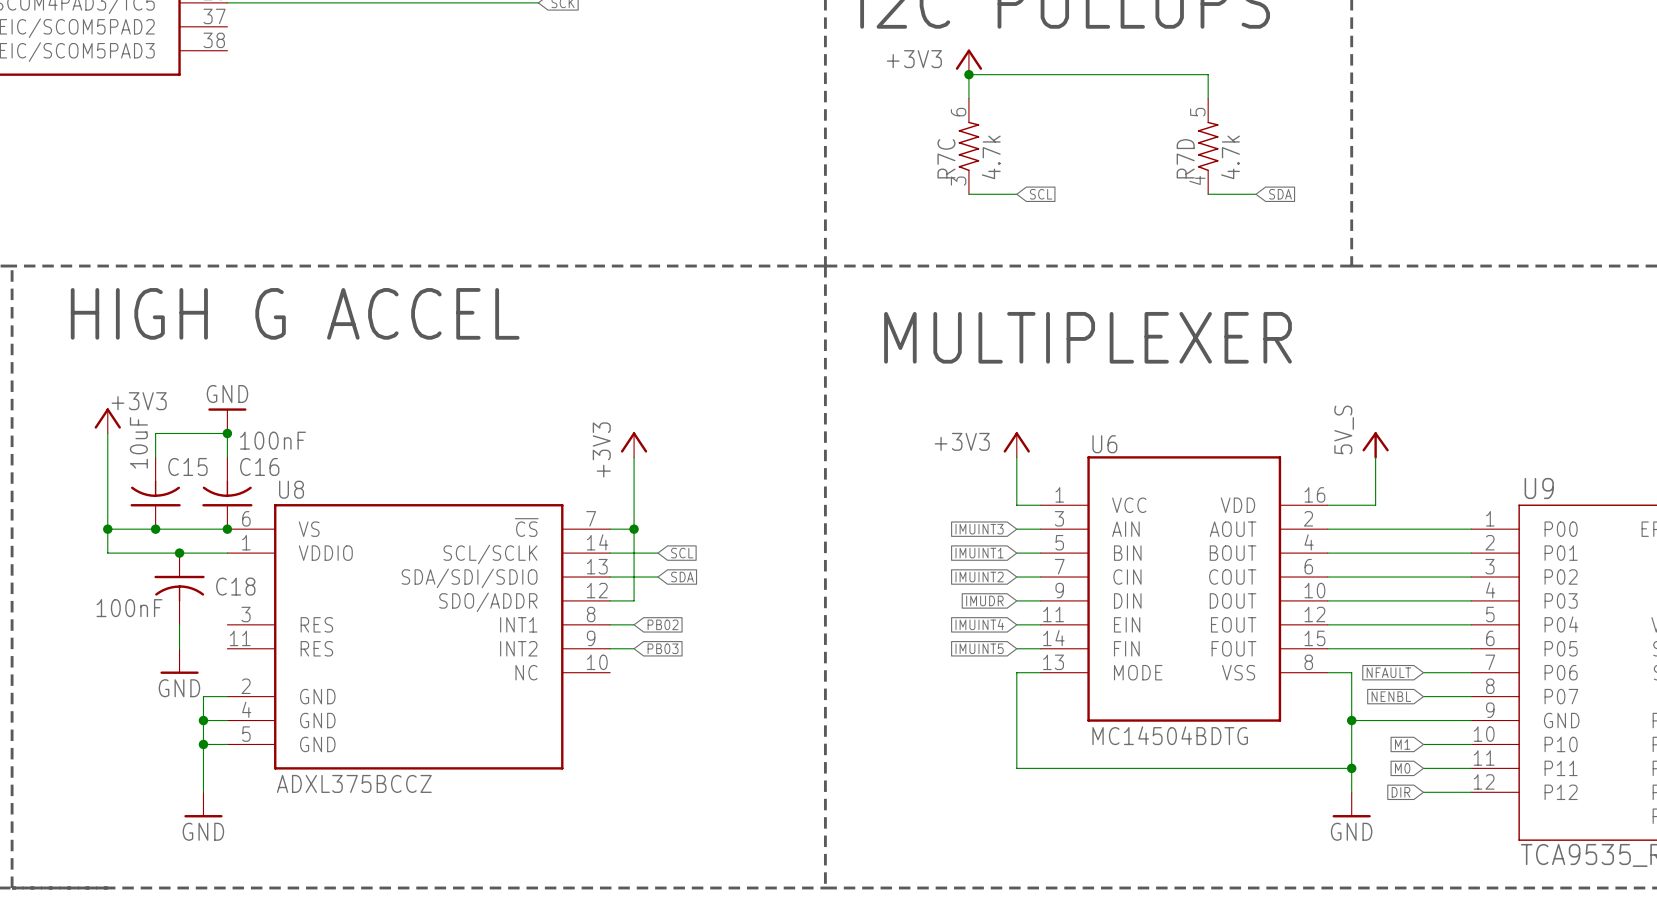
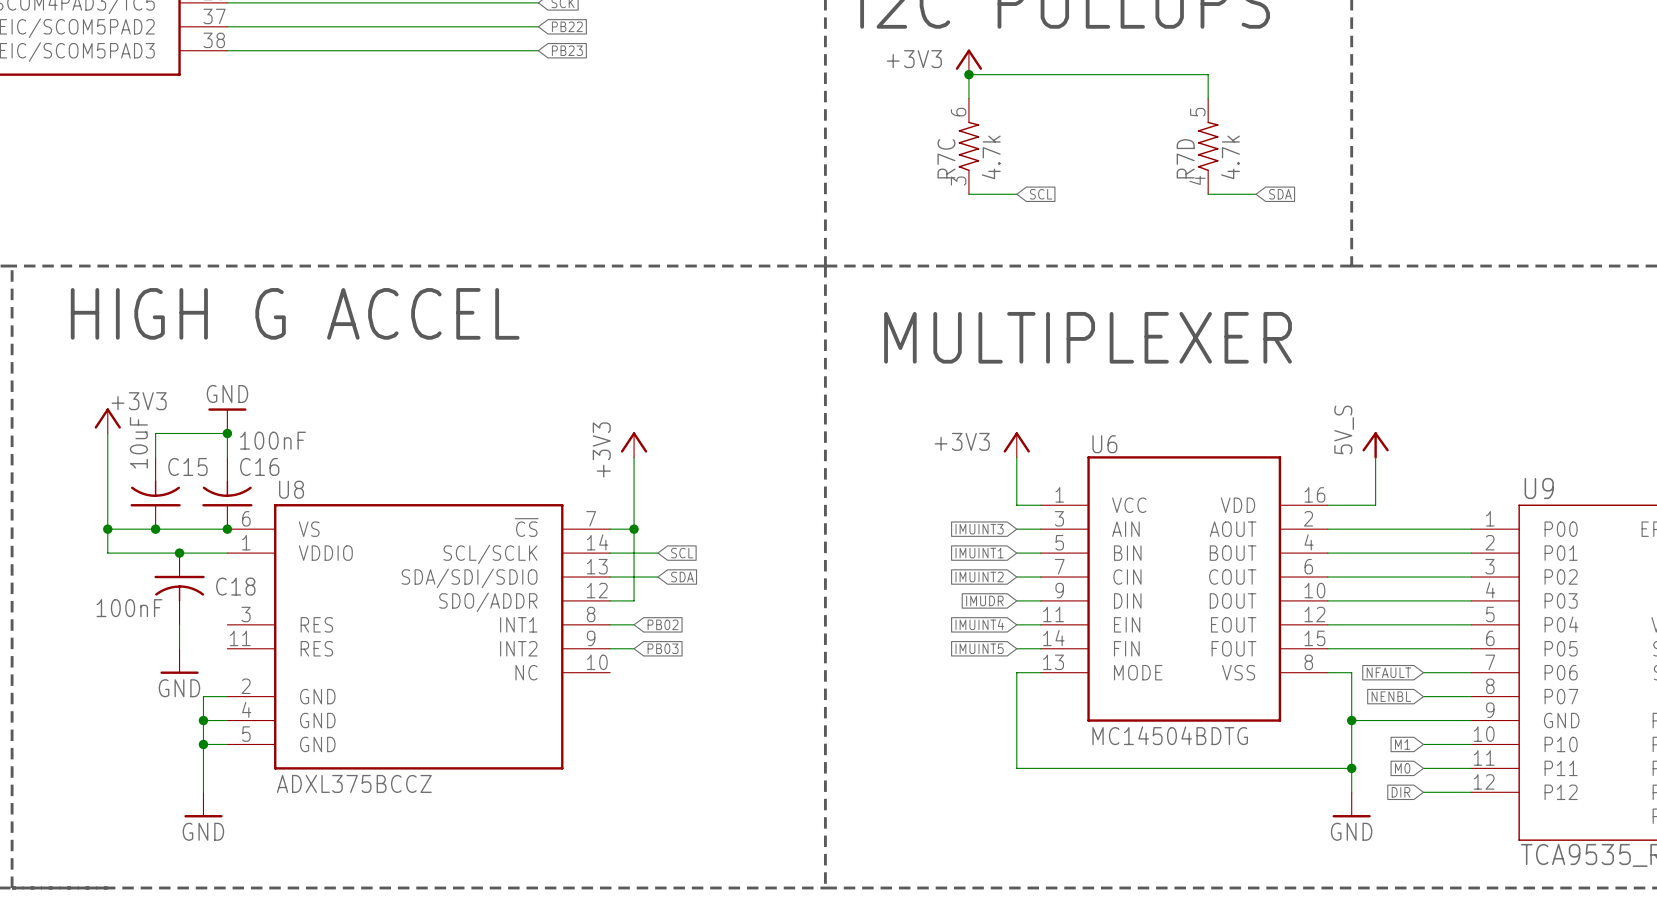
wire: none -> (227, 26) (538, 26)
global label: none -> PB22 (567, 26)
wire: none -> (227, 50) (538, 50)
global label: none -> PB23 (567, 50)

